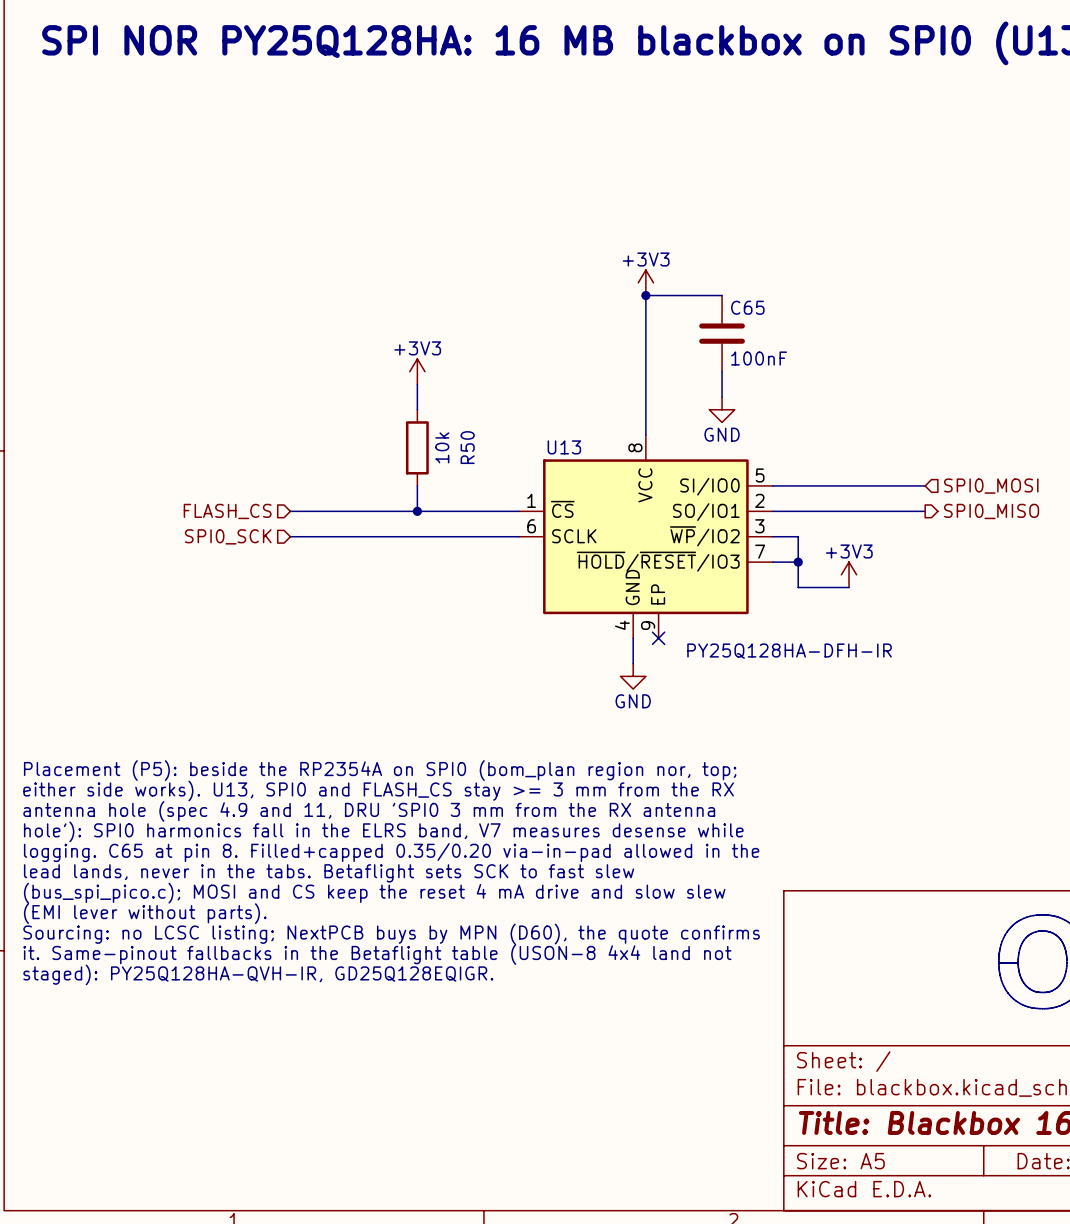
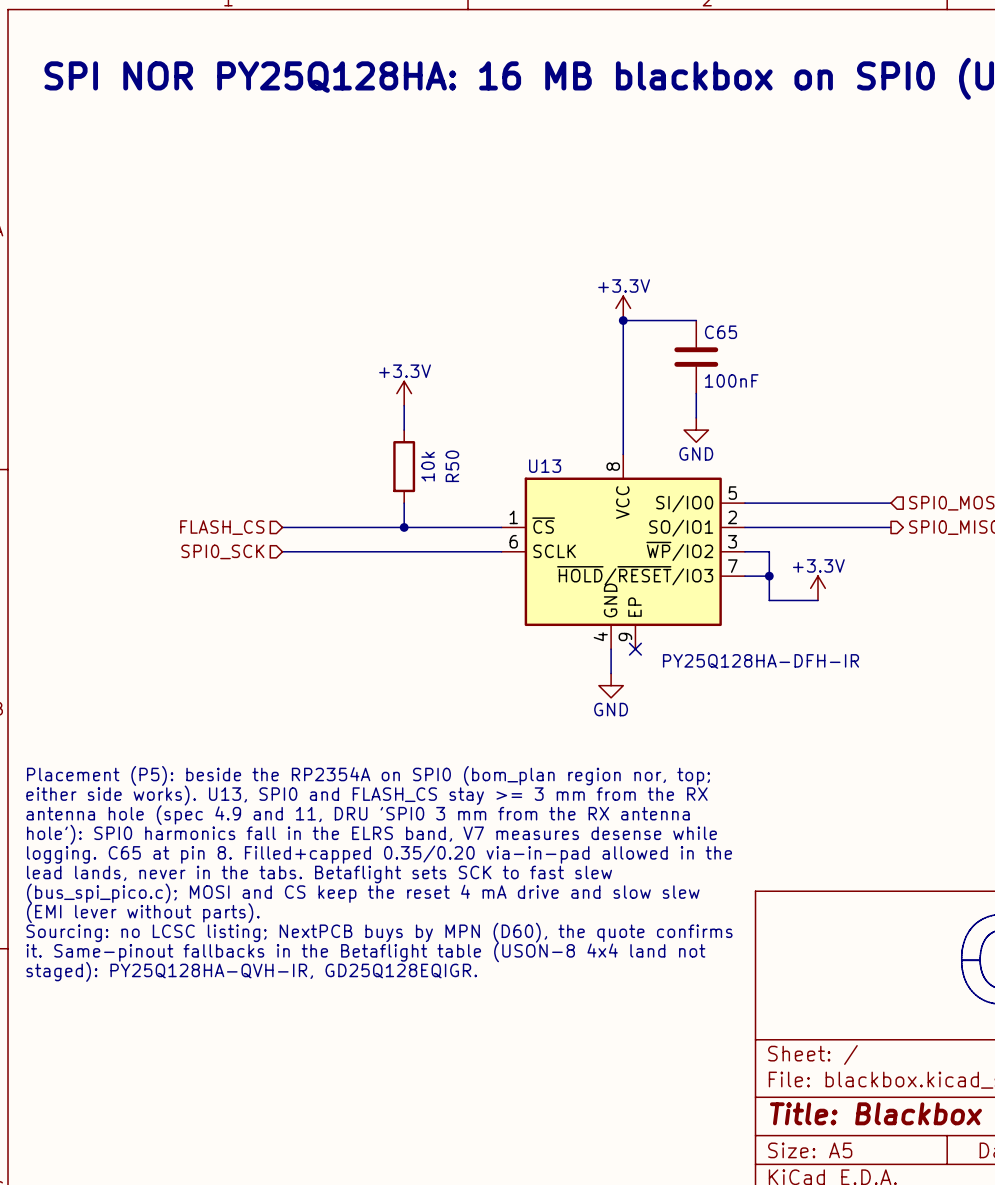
power symbol: +3V3 (645, 282) -> +3.3V (623, 308)
power symbol: +3V3 (417, 371) -> +3.3V (404, 393)
power symbol: +3V3 (849, 574) -> +3.3V (817, 588)

